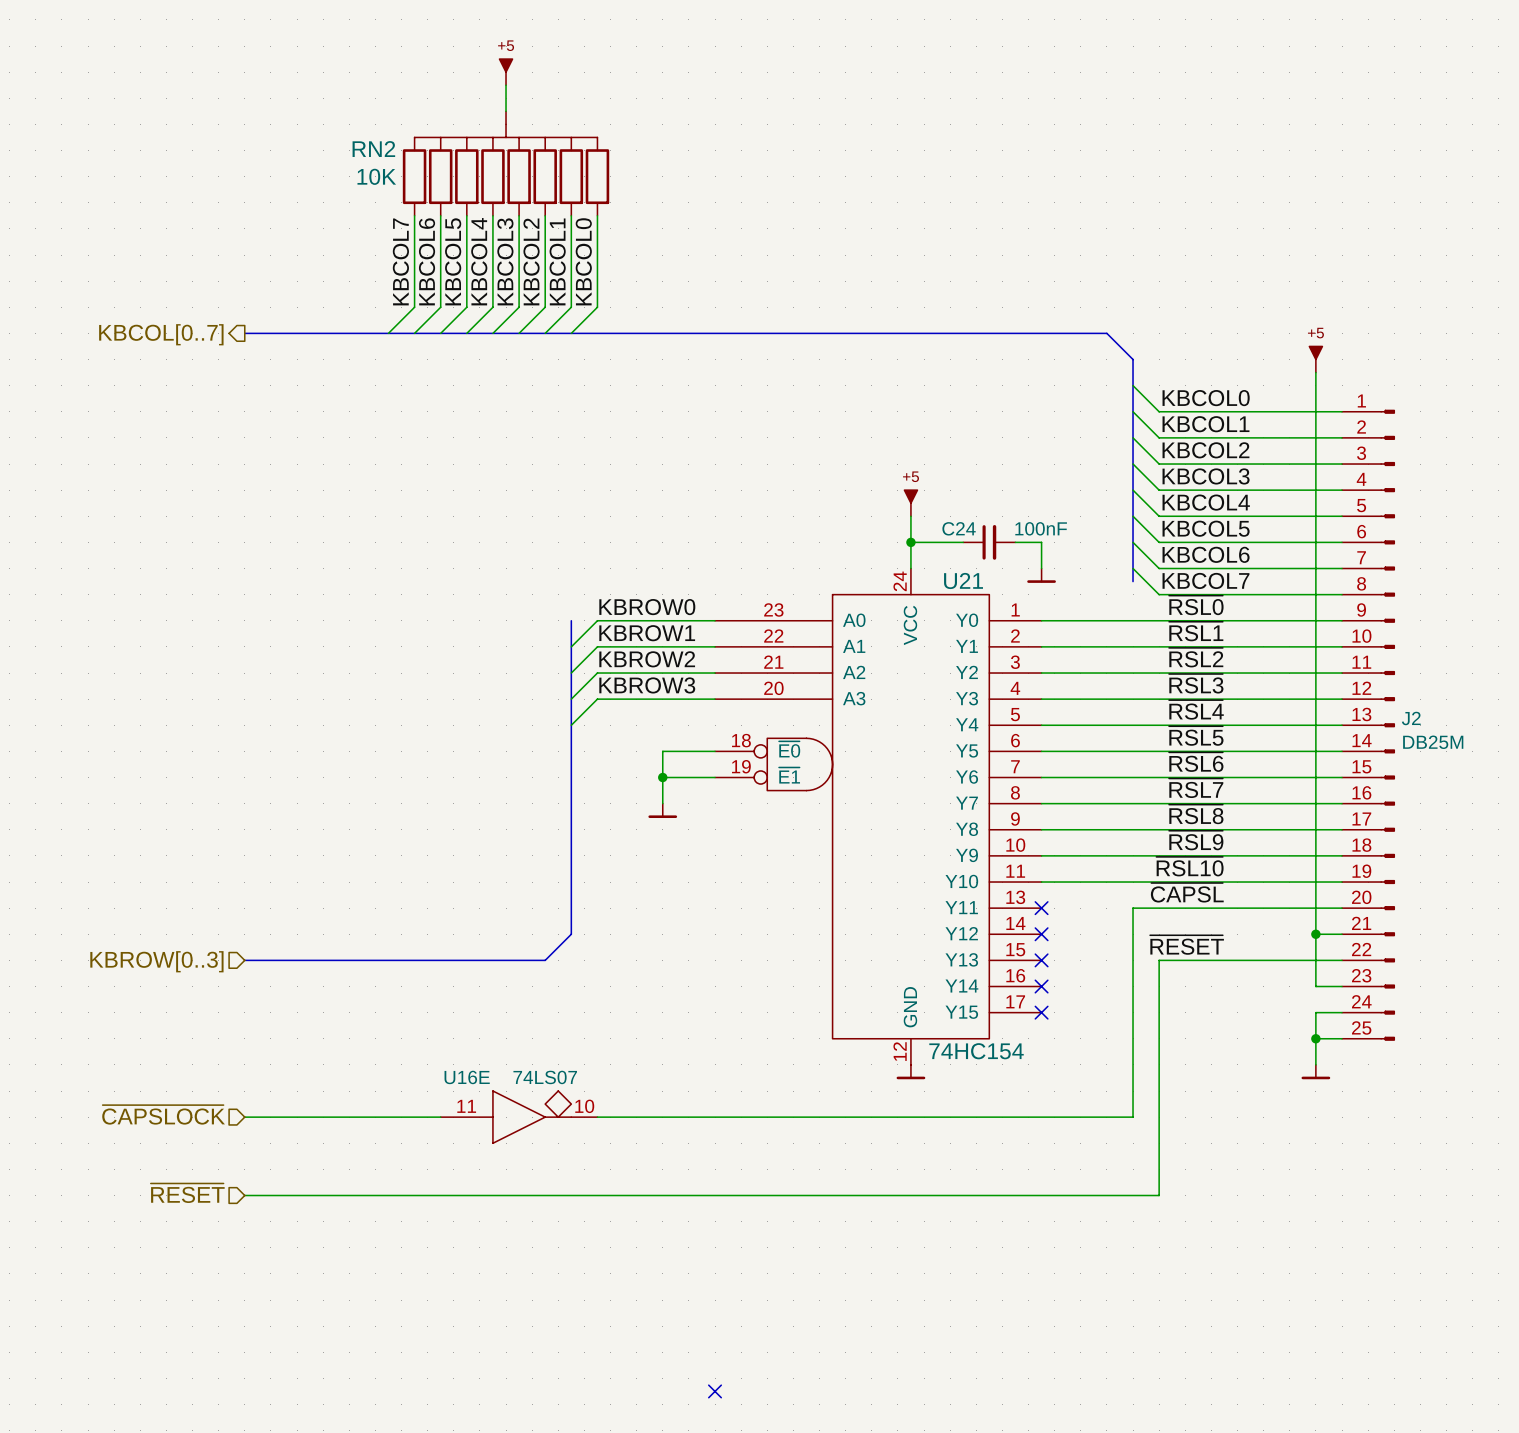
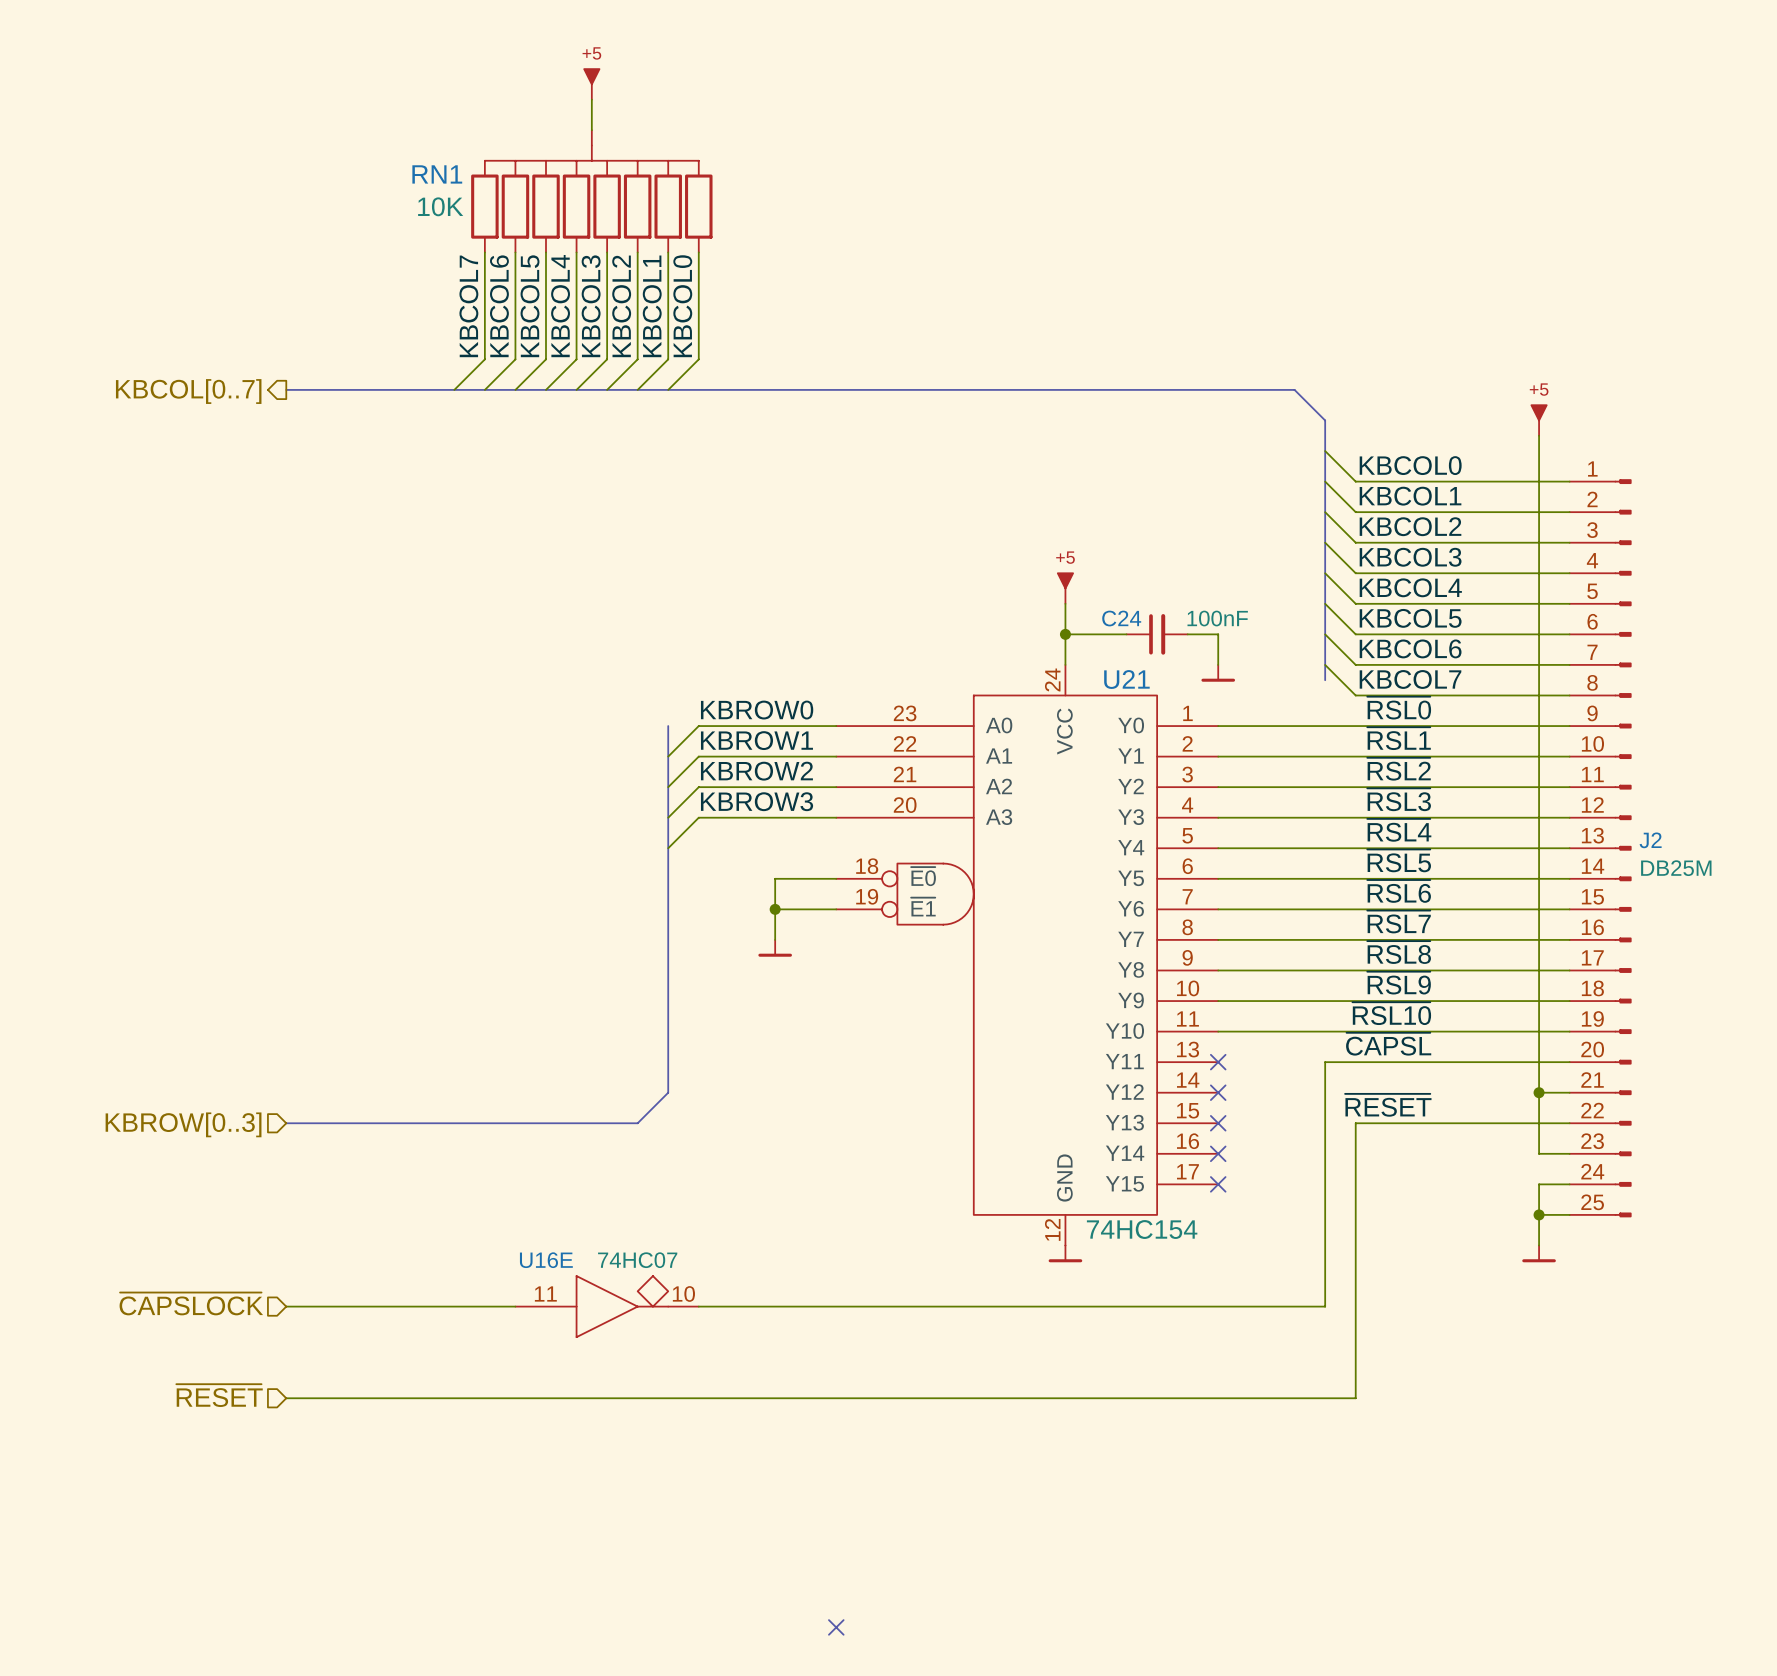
RN2 name: RN2 (373, 149) -> RN1 (437, 174)
U16E value: 74LS07 (545, 1077) -> 74HC07 (637, 1260)

